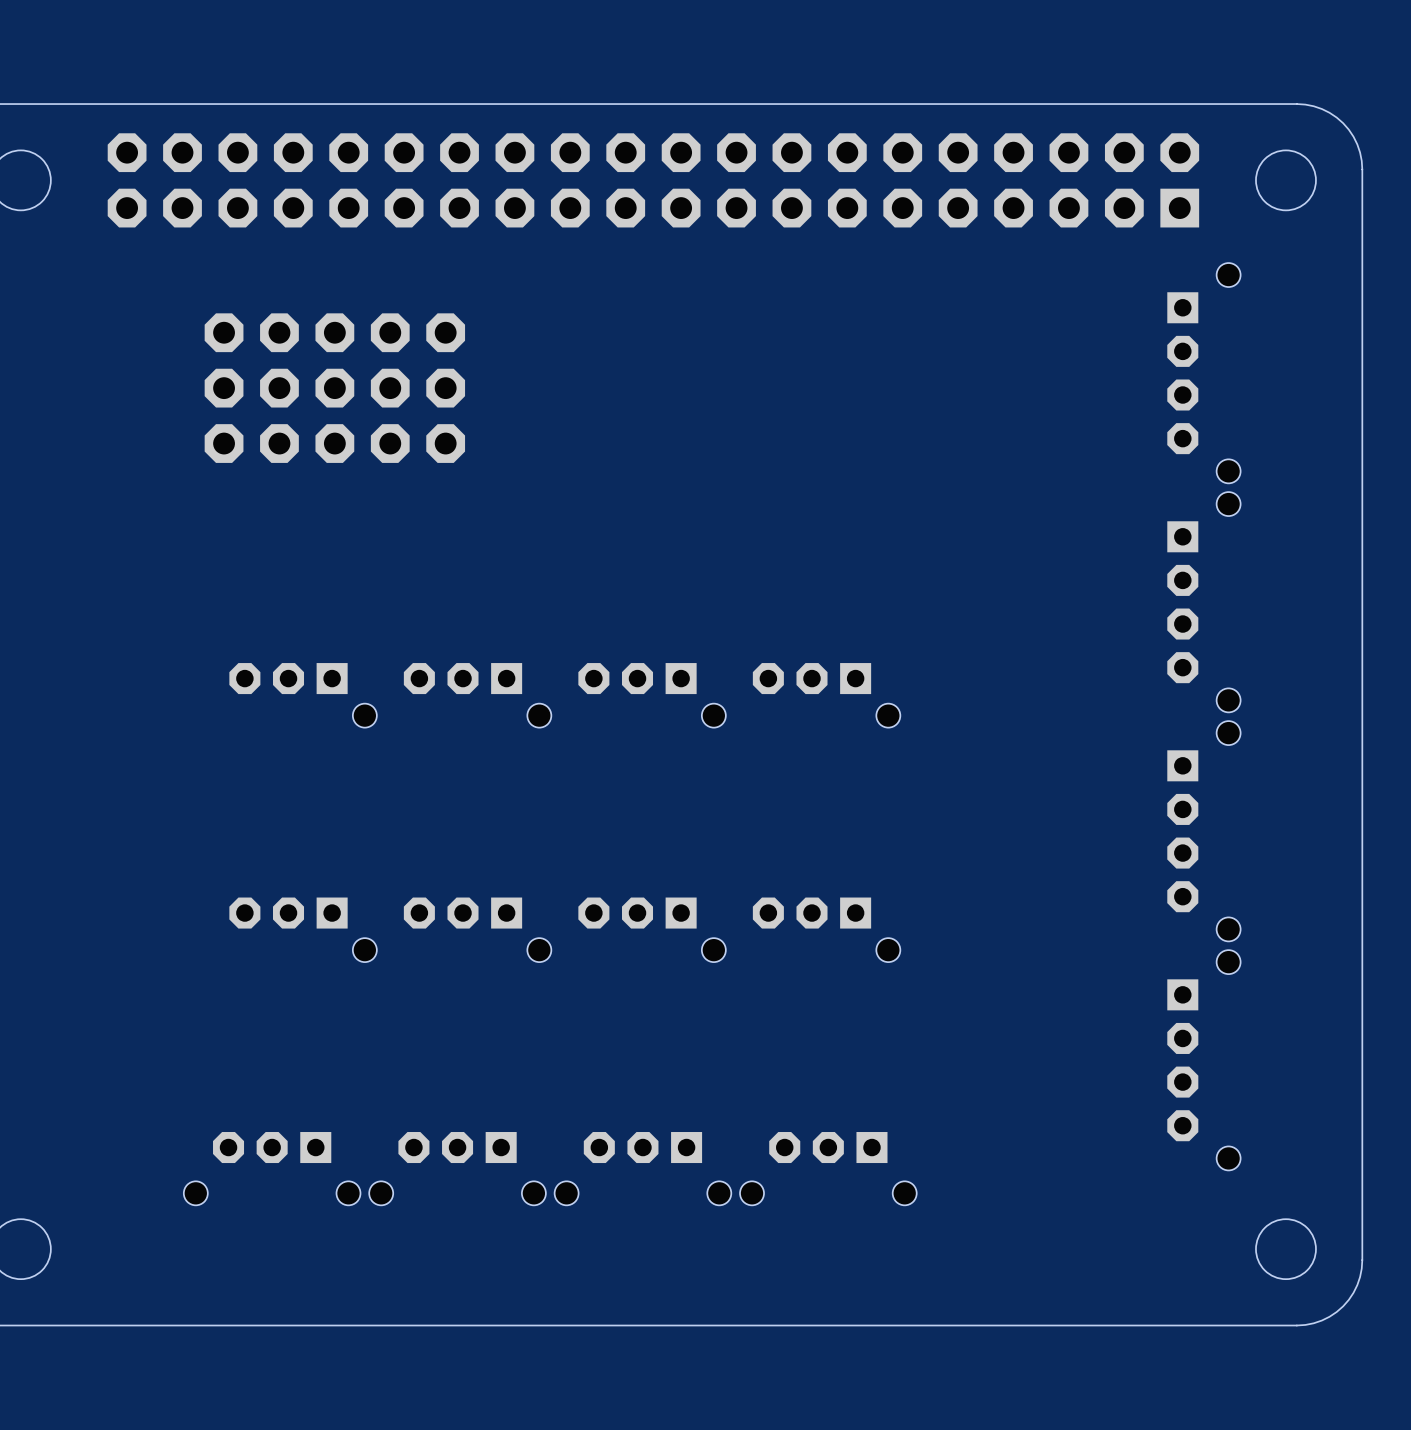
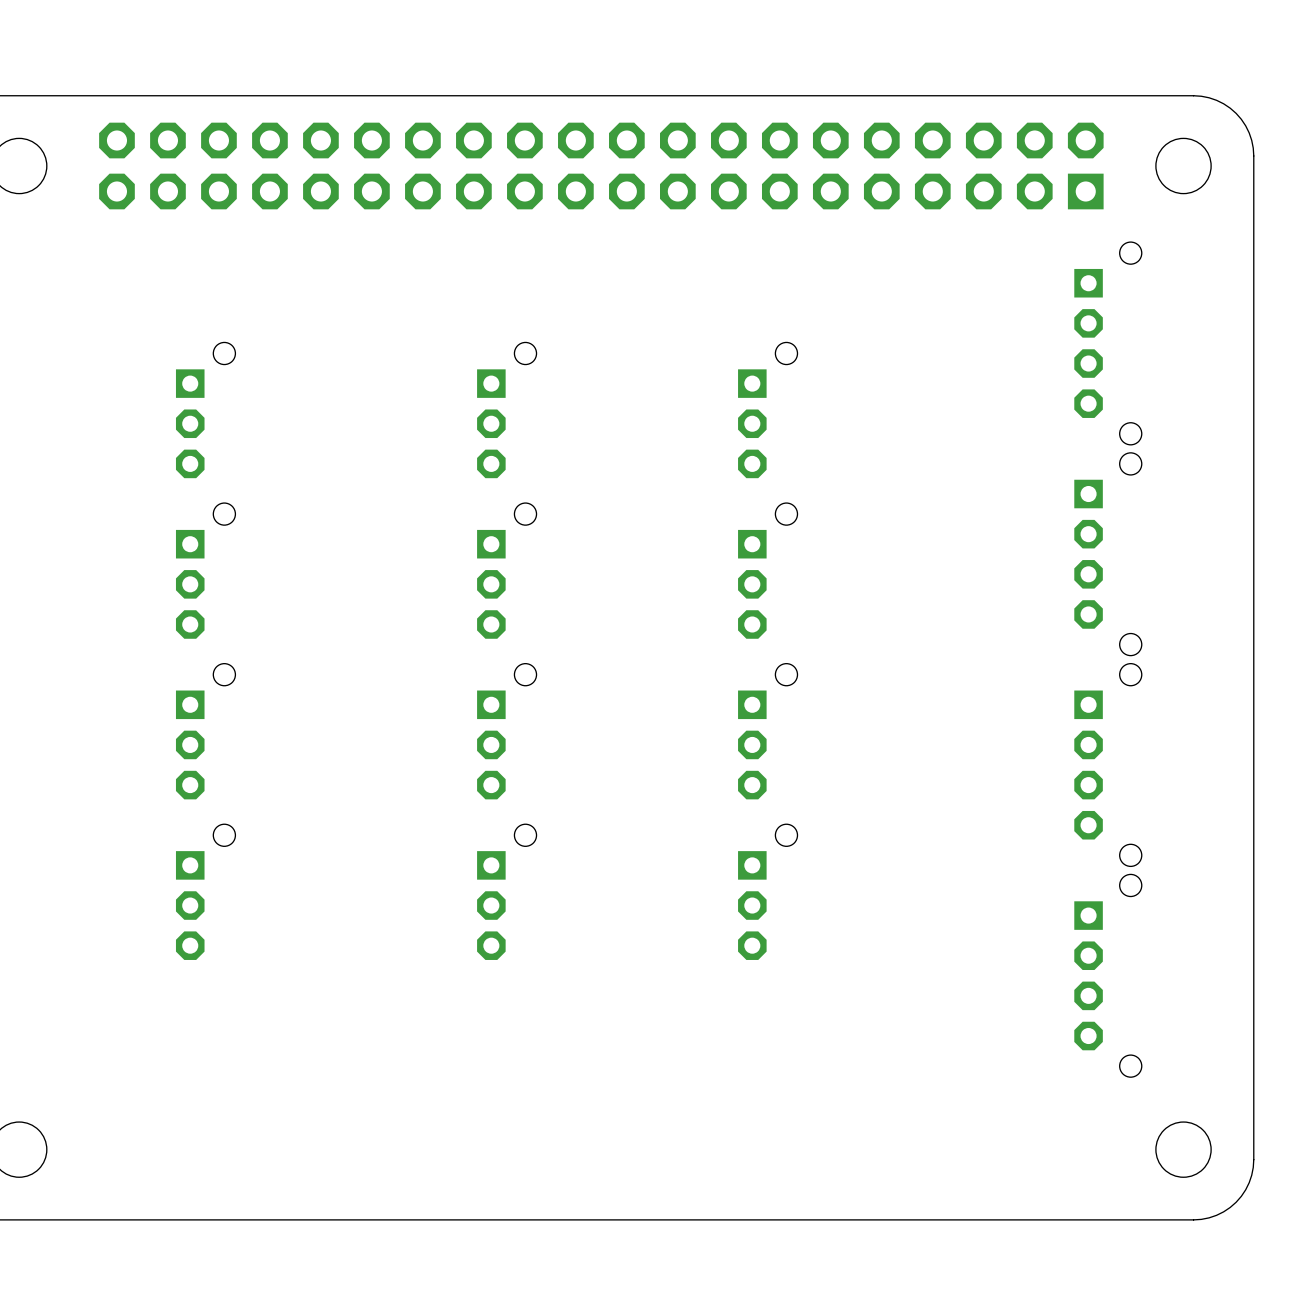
part: (224, 388) -> none
part: (279, 388) -> none
part: (334, 388) -> none
part: (390, 388) -> none
part: (445, 388) -> none
part: none -> (205, 410)
part: none -> (506, 410)
part: none -> (767, 410)
part: none -> (205, 570)
part: none -> (506, 570)
part: none -> (767, 570)
part: (303, 695) -> none
part: (477, 695) -> none
part: (652, 695) -> none
part: (826, 695) -> none
part: none -> (205, 731)
part: none -> (506, 731)
part: none -> (767, 731)
part: (303, 929) -> none
part: (477, 929) -> none
part: (652, 929) -> none
part rotation: 0° (826, 929) -> 90° counterclockwise (767, 892)
part: none -> (205, 892)
part: none -> (506, 892)
part: (272, 1168) -> none
part: (457, 1168) -> none
part: (642, 1168) -> none
part: (828, 1168) -> none

